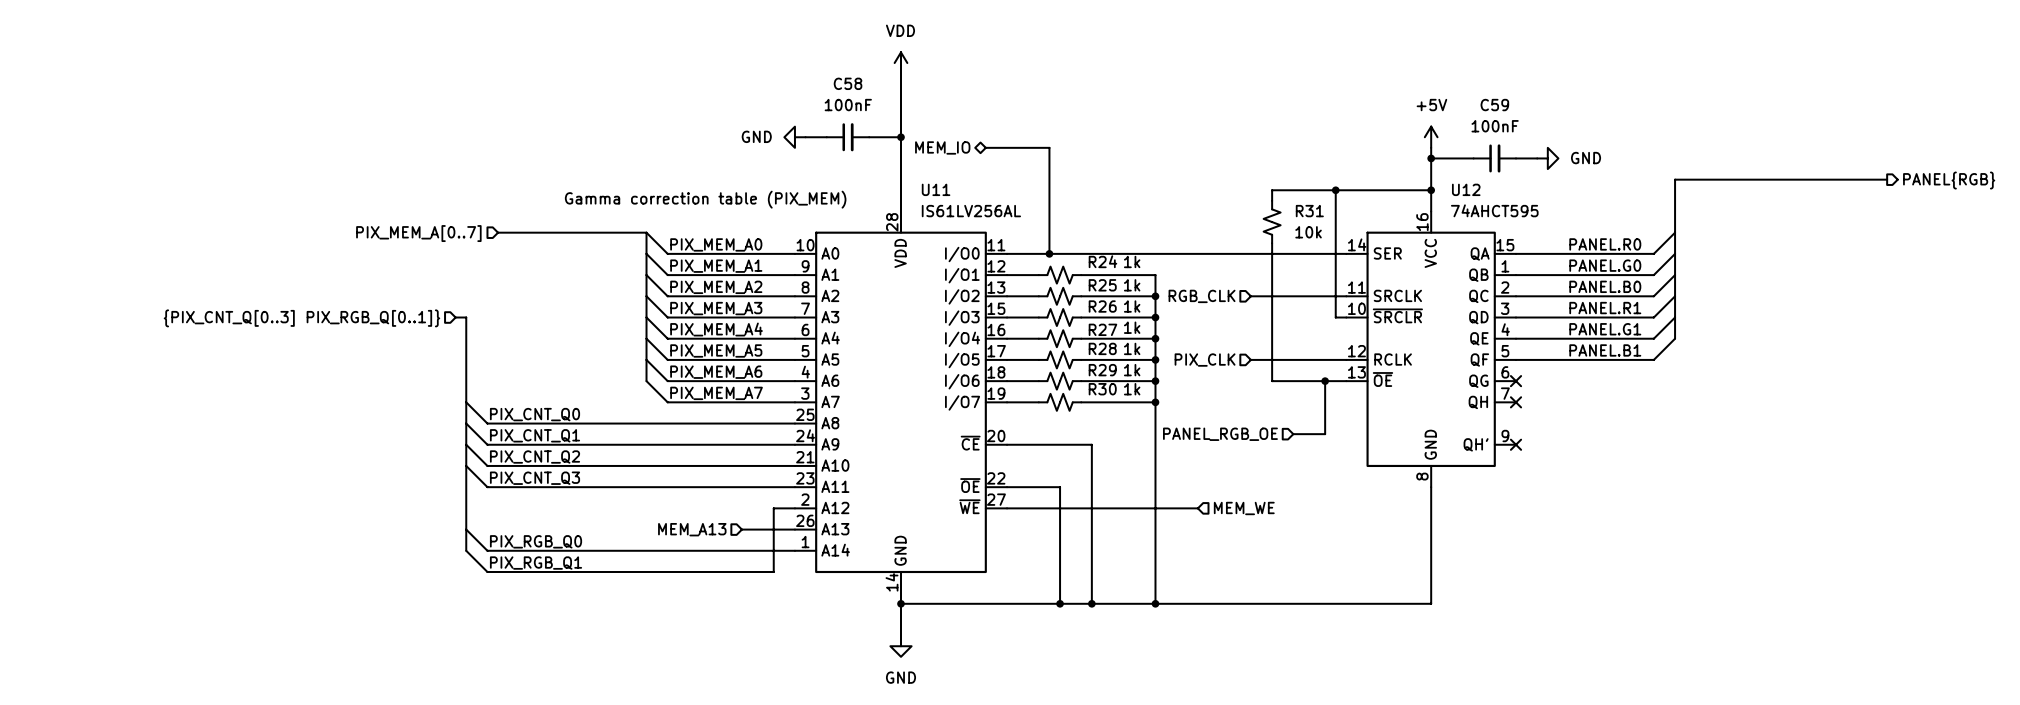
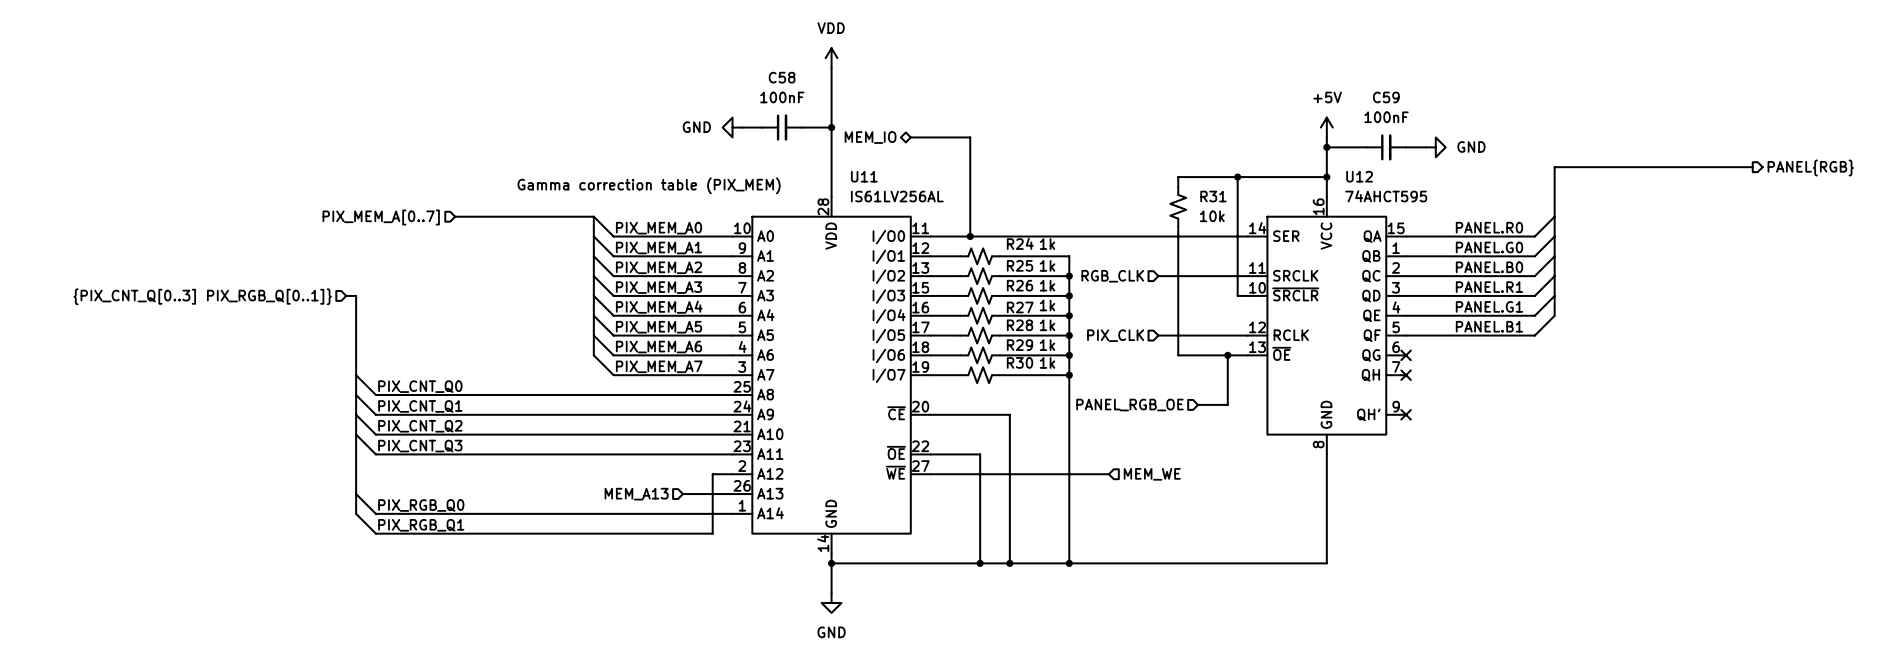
bus: (455, 317) (466, 317) (466, 550) -> (346, 295) (356, 295) (356, 513)
hierarchical label position: {PIX_CNT_Q[0..3] PIX_RGB_Q[0..1]} (301, 318) -> {PIX_CNT_Q[0..3] PIX_RGB_Q[0..1]} (202, 296)
wire: (466, 402) (487, 423) -> (356, 375) (375, 394) (445, 394)
label position: PIX_CNT_Q0 (535, 414) -> PIX_CNT_Q0 (420, 386)
wire: (466, 423) (487, 444) -> (356, 394) (375, 414) (445, 414)
label position: PIX_CNT_Q1 (535, 435) -> PIX_CNT_Q1 (420, 406)
wire: (466, 444) (487, 465) -> (356, 414) (375, 434) (445, 434)
label position: PIX_CNT_Q2 (535, 457) -> PIX_CNT_Q2 (420, 426)
wire: (466, 465) (487, 487) -> (356, 434) (375, 454) (445, 454)
label position: PIX_CNT_Q3 (535, 478) -> PIX_CNT_Q3 (420, 446)
wire: (466, 529) (487, 550) -> (356, 494) (375, 513) (445, 513)
label position: PIX_RGB_Q0 (536, 541) -> PIX_RGB_Q0 (421, 505)
wire: (466, 550) (487, 571) -> (356, 513) (375, 533) (445, 533)
label position: PIX_RGB_Q1 (536, 563) -> PIX_RGB_Q1 (421, 525)

